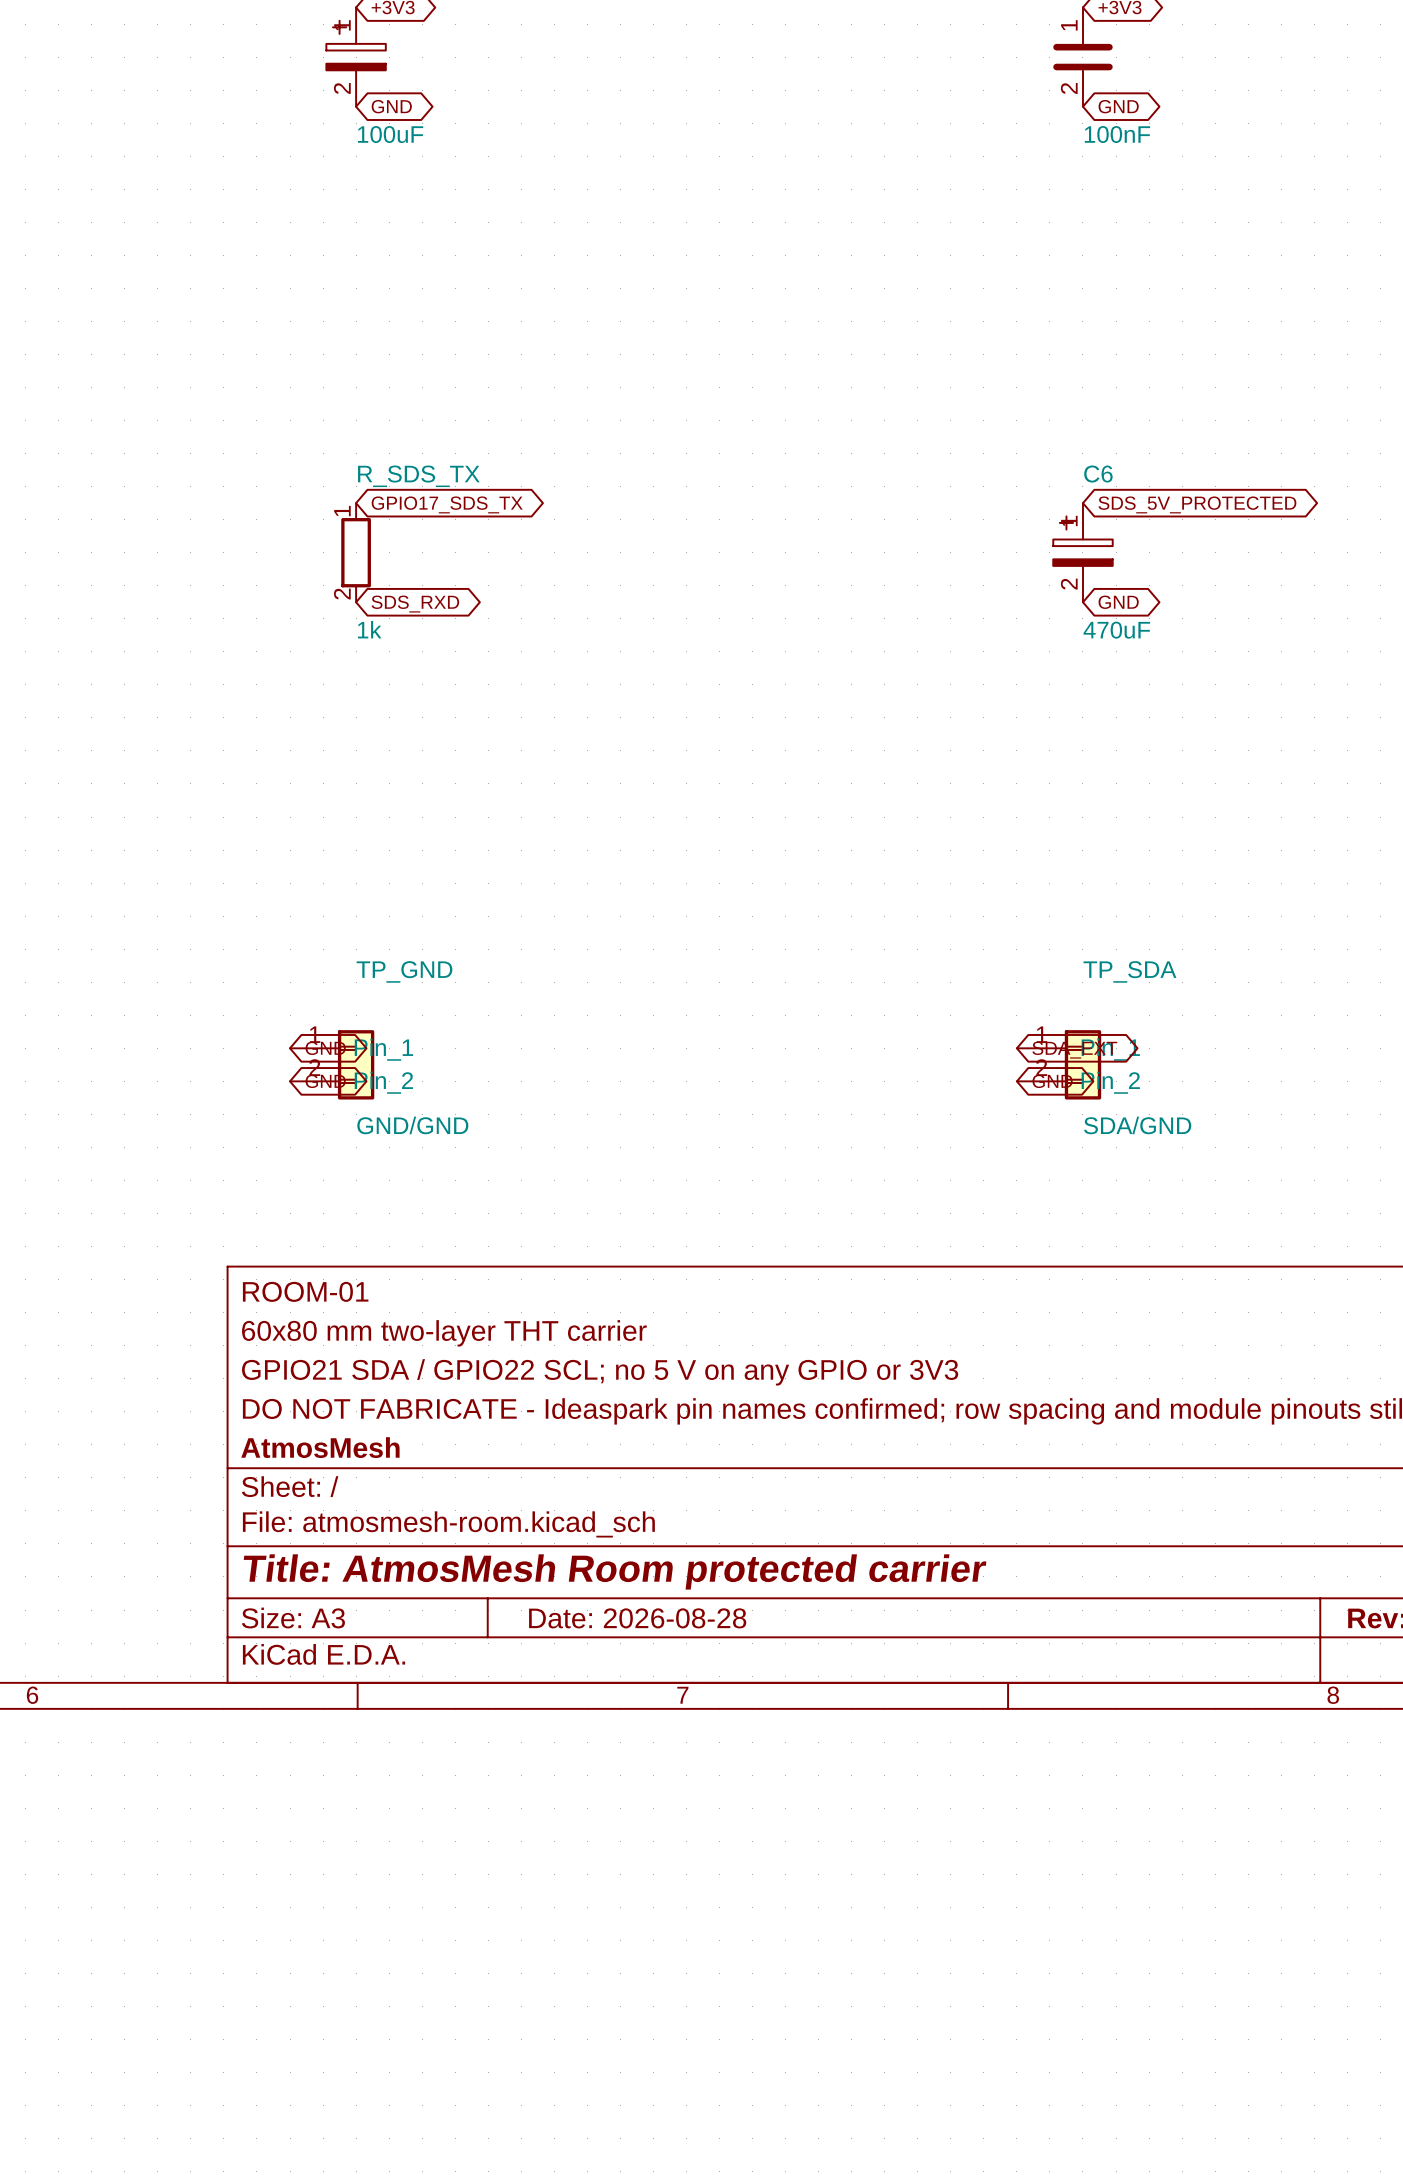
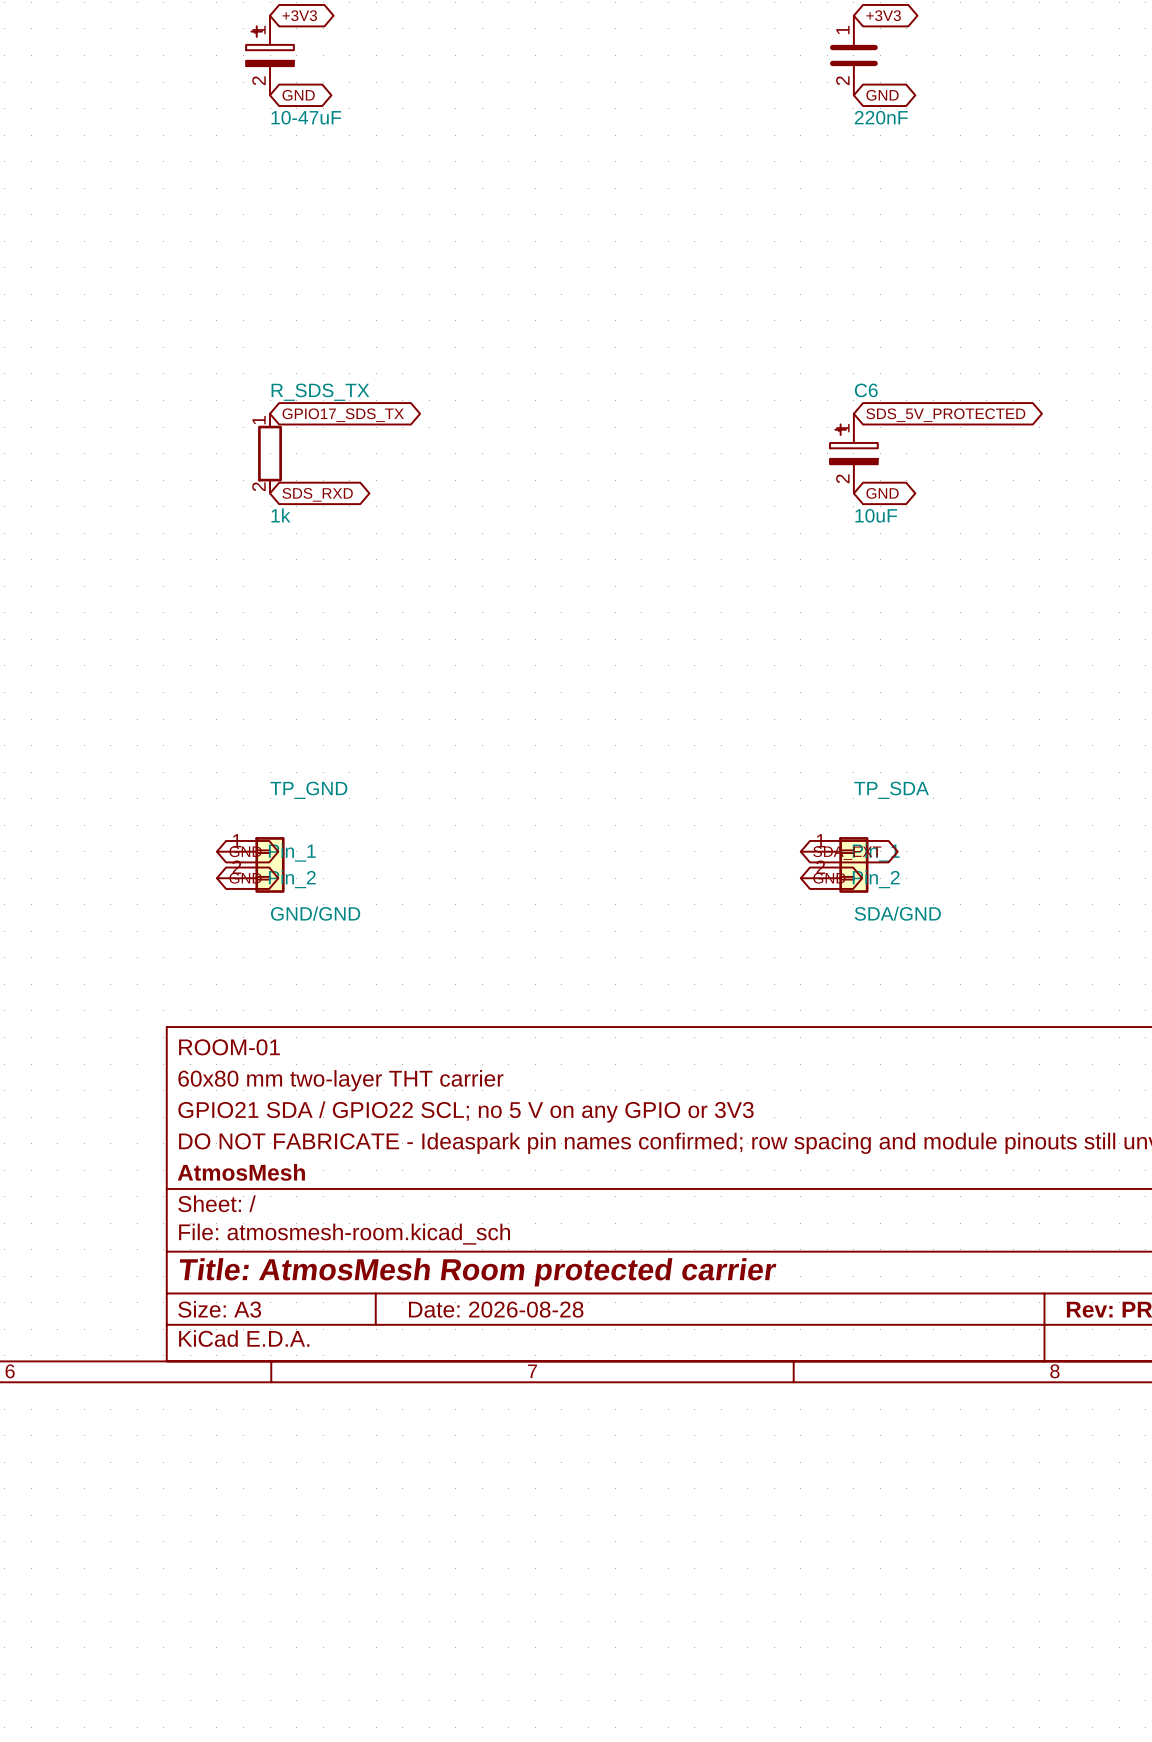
part value: 100uF (390, 134) -> 10-47uF (306, 117)
part value: 100nF (1117, 134) -> 220nF (881, 117)
C6 value: 470uF (1116, 630) -> 10uF (876, 515)

